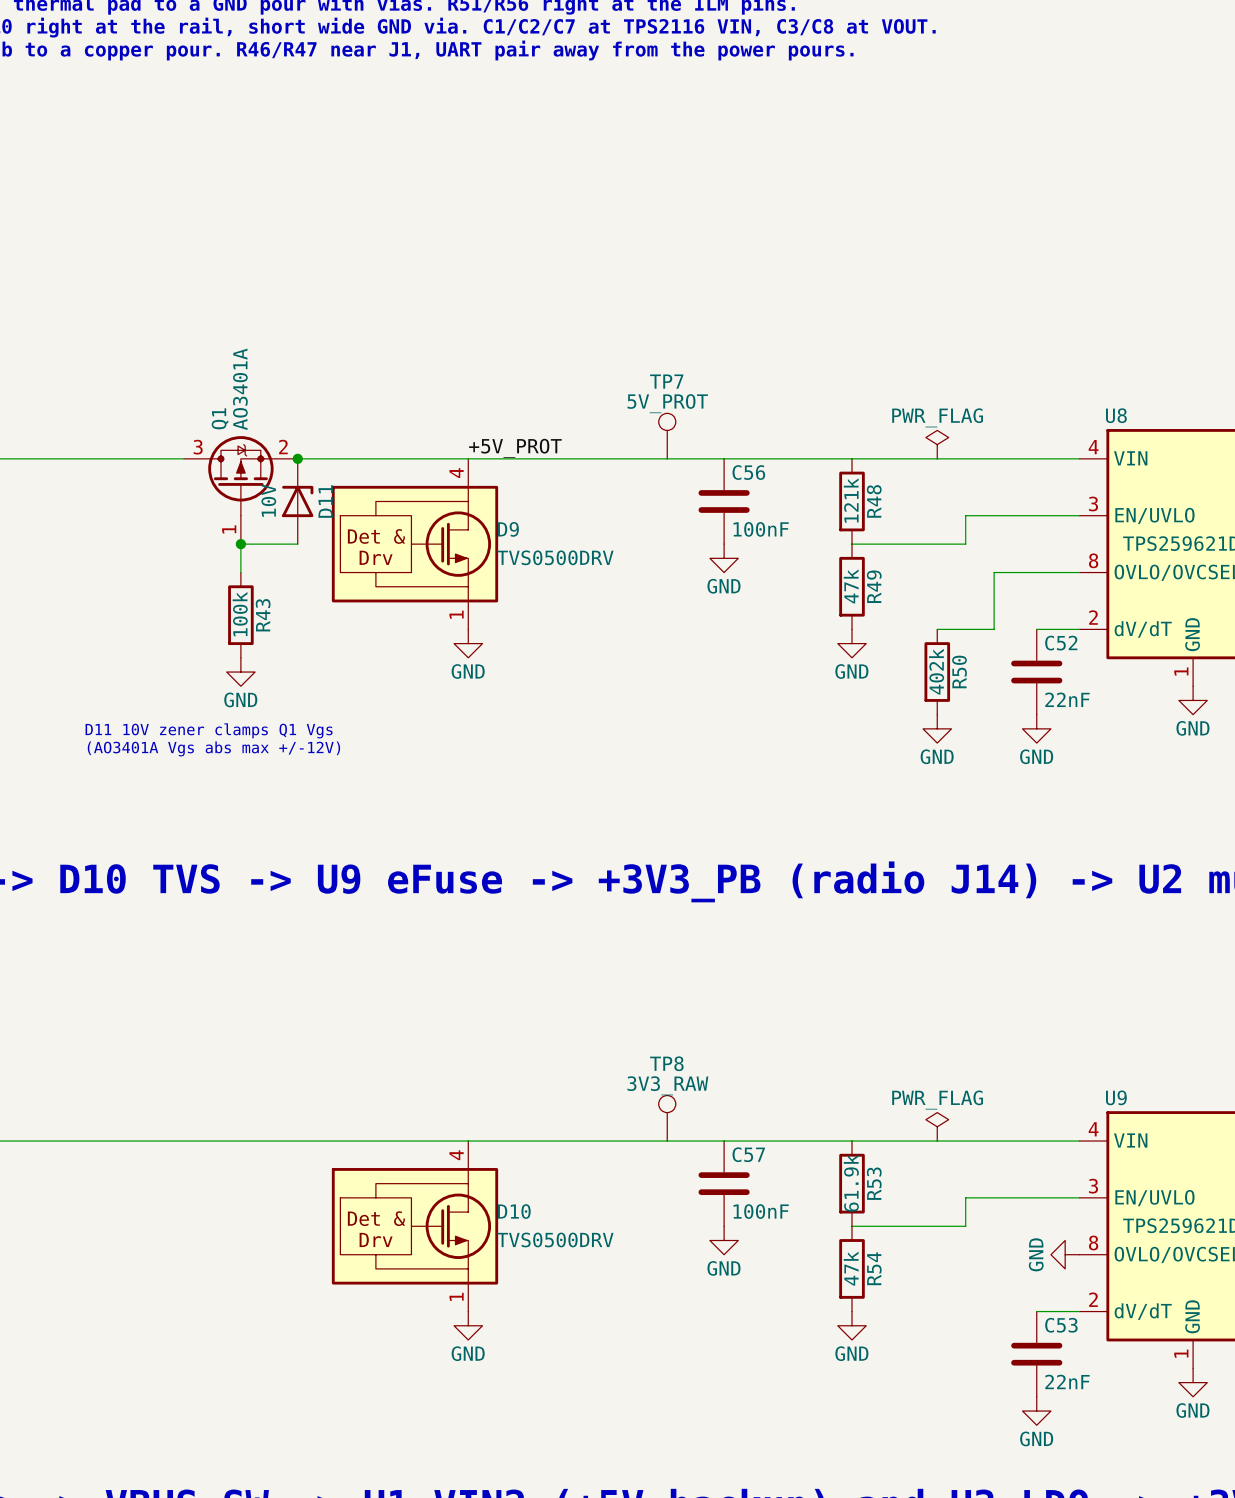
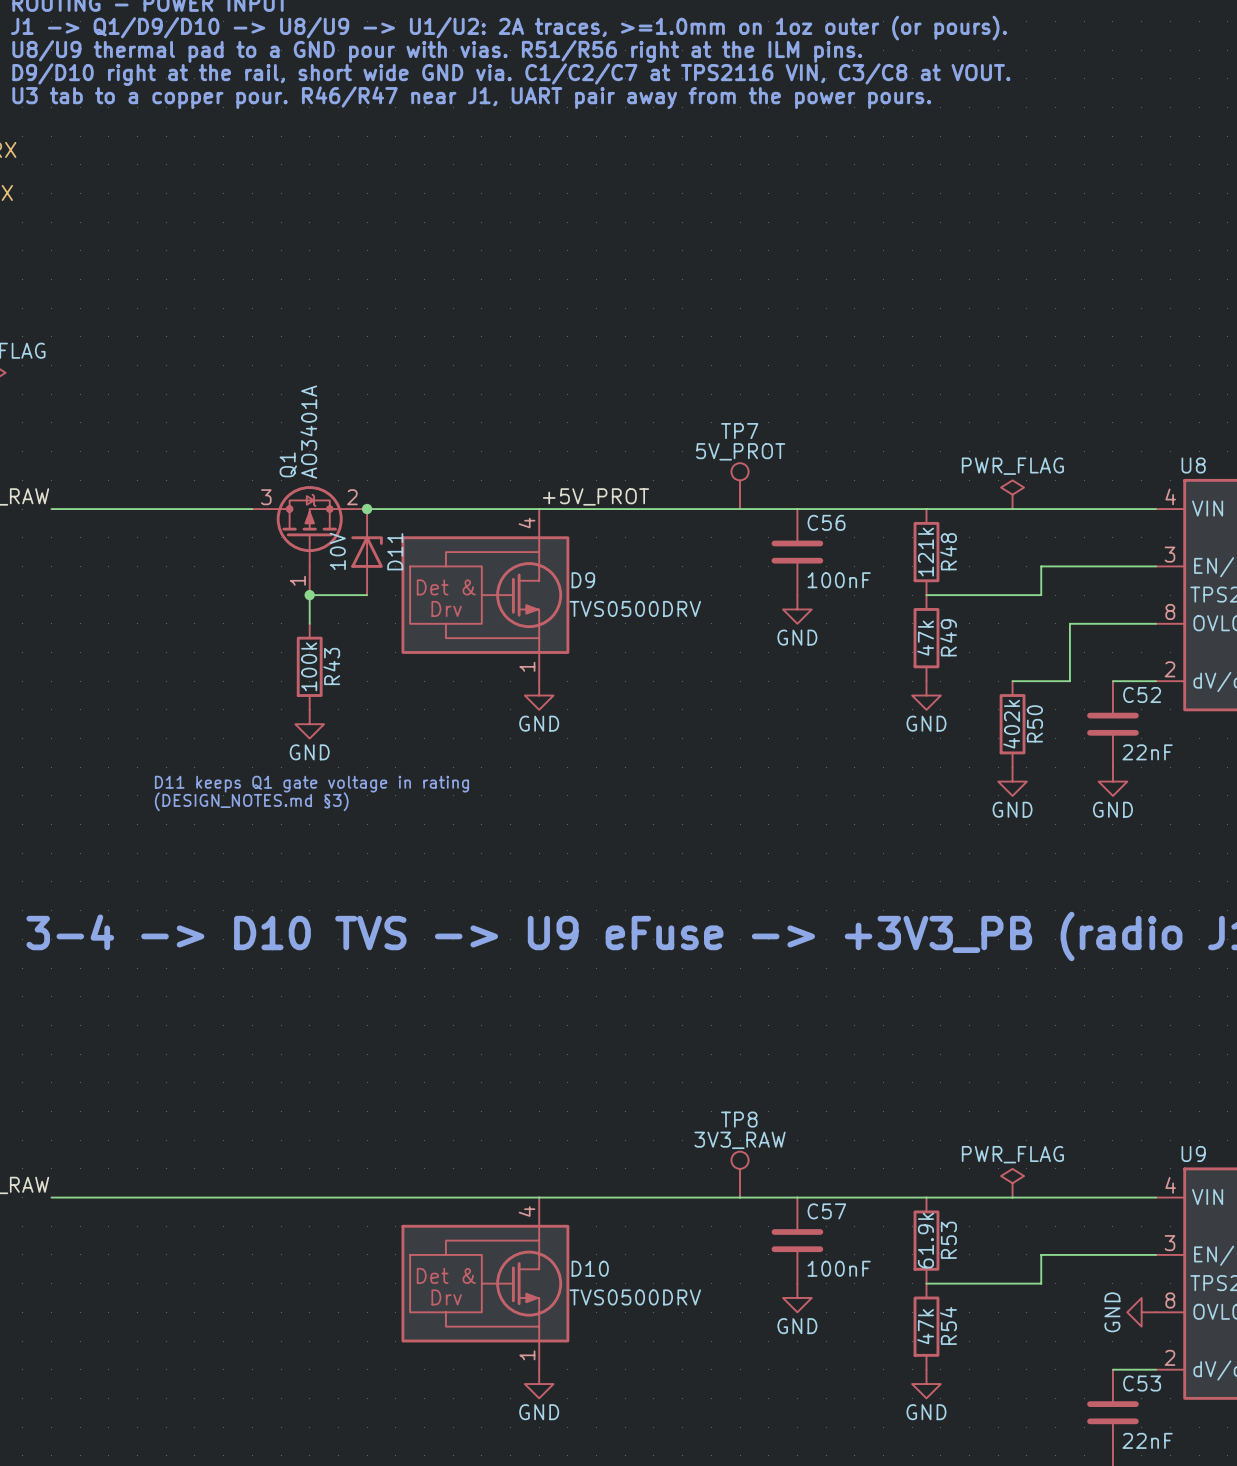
text: D11 10V zener clamps Q1 Vgs (209, 730) -> D11 keeps Q1 gate voltage in rating (311, 784)
text: (AO3401A Vgs abs max +/-12V) (213, 748) -> (DESIGN_NOTES.md §3) (251, 801)

